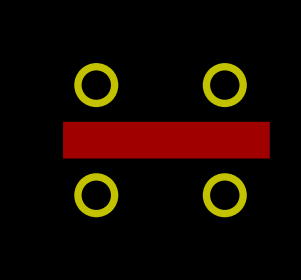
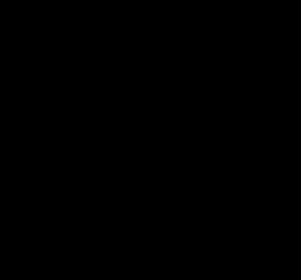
part: (166, 140) -> none

